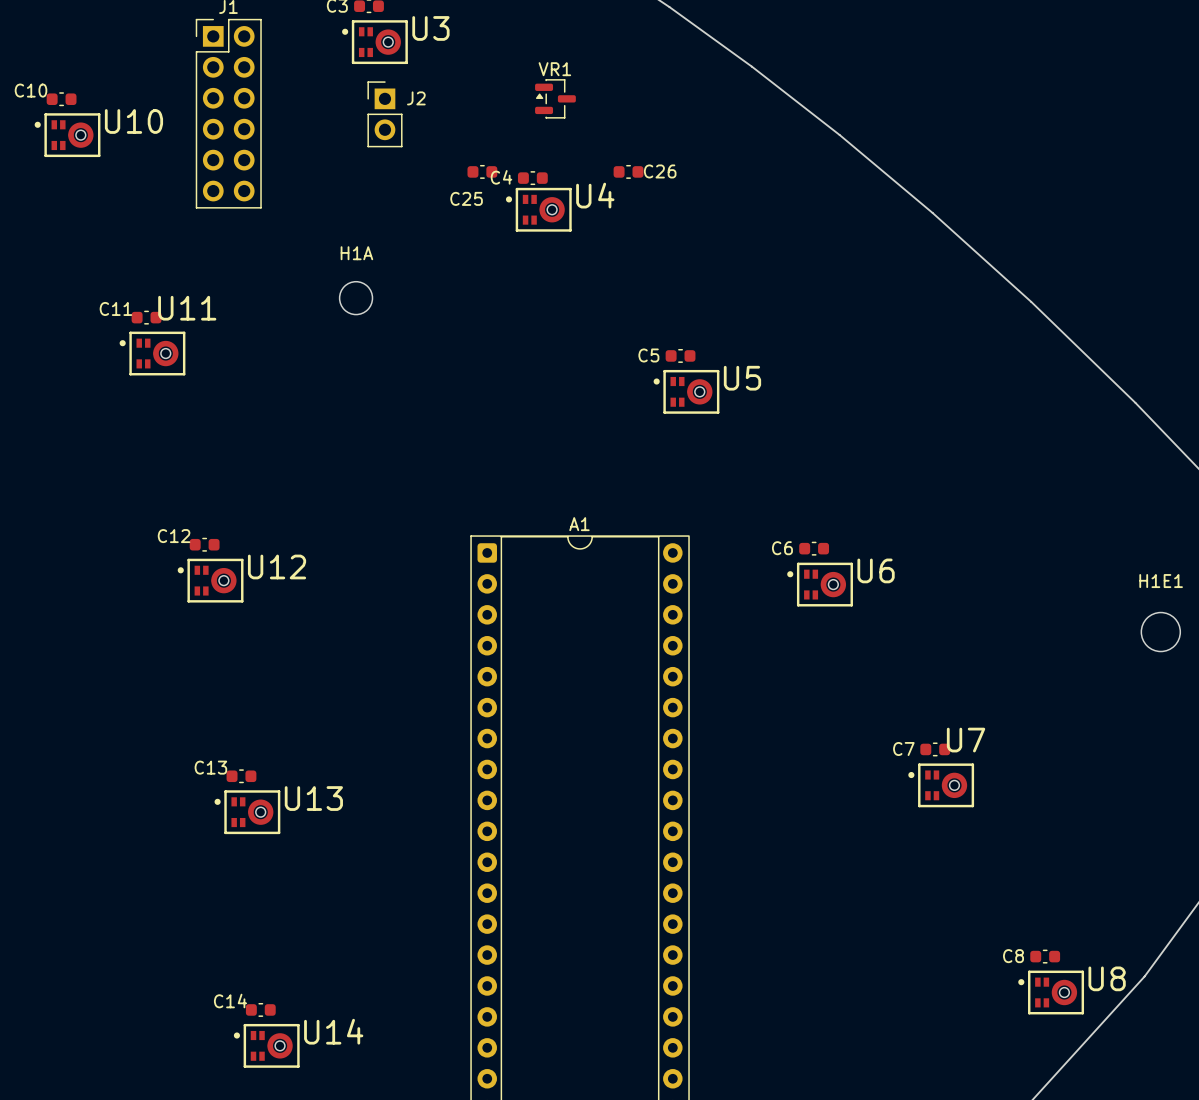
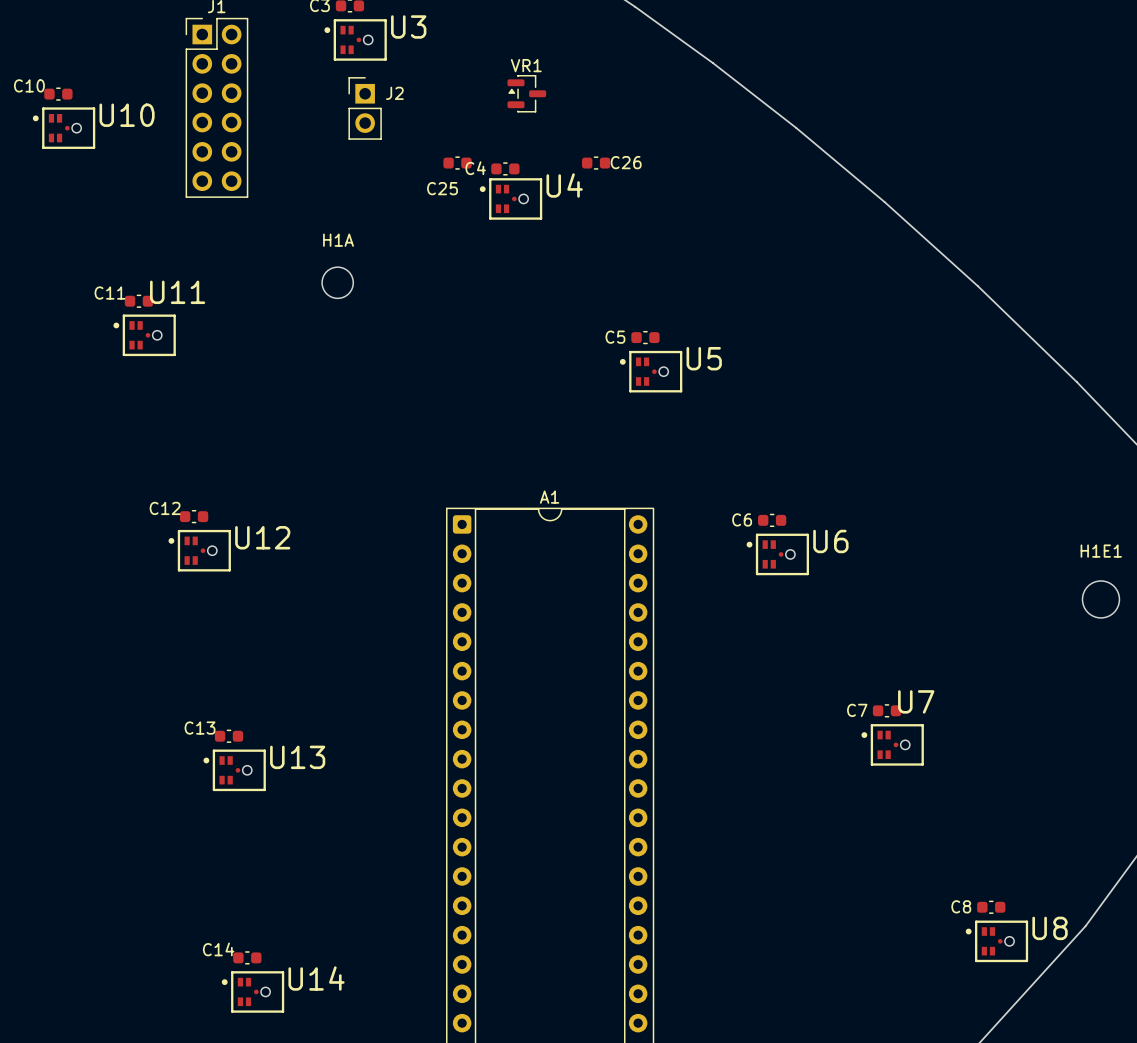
U3 footprint: [342, 20, 408, 65] -> [324, 19, 387, 61]
U10 footprint: [34, 113, 101, 158] -> [32, 107, 96, 149]
U4 footprint: [505, 187, 572, 232] -> [479, 178, 543, 220]
U11 footprint: [119, 331, 186, 376] -> [113, 314, 176, 357]
U5 footprint: [653, 369, 720, 414] -> [619, 350, 683, 393]
U12 footprint: [177, 558, 244, 603] -> [168, 529, 231, 572]
U6 footprint: [787, 562, 853, 607] -> [746, 533, 809, 576]
U7 footprint: [908, 763, 975, 808] -> [861, 724, 924, 766]
U13 footprint: [214, 790, 281, 835] -> [203, 749, 266, 792]
U8 footprint: [1018, 970, 1085, 1015] -> [965, 920, 1029, 963]
U14 footprint: [233, 1023, 300, 1068] -> [221, 971, 285, 1013]

